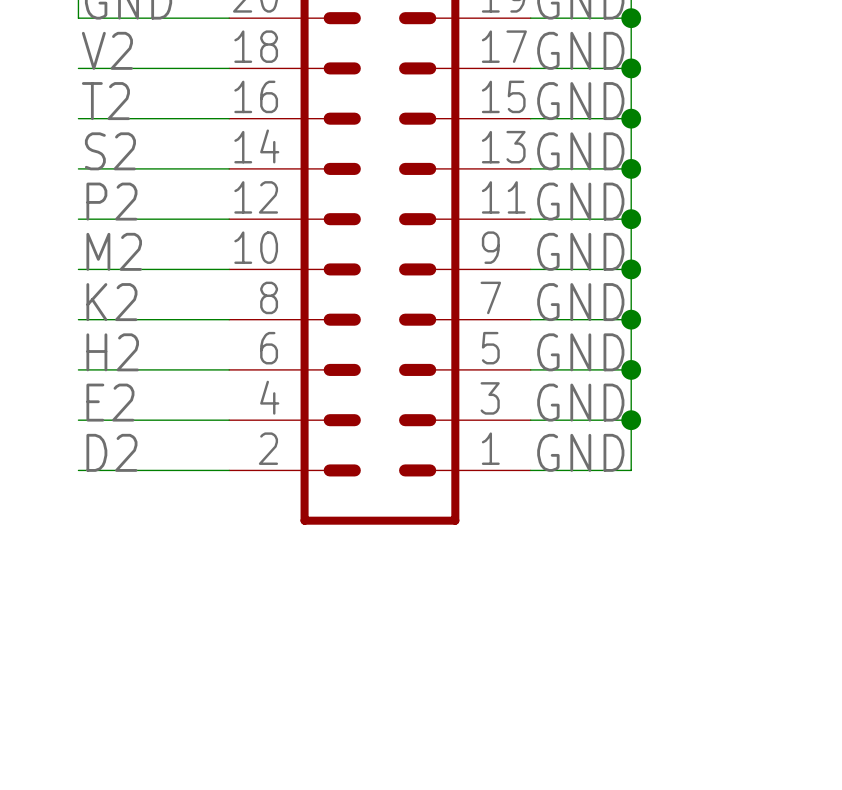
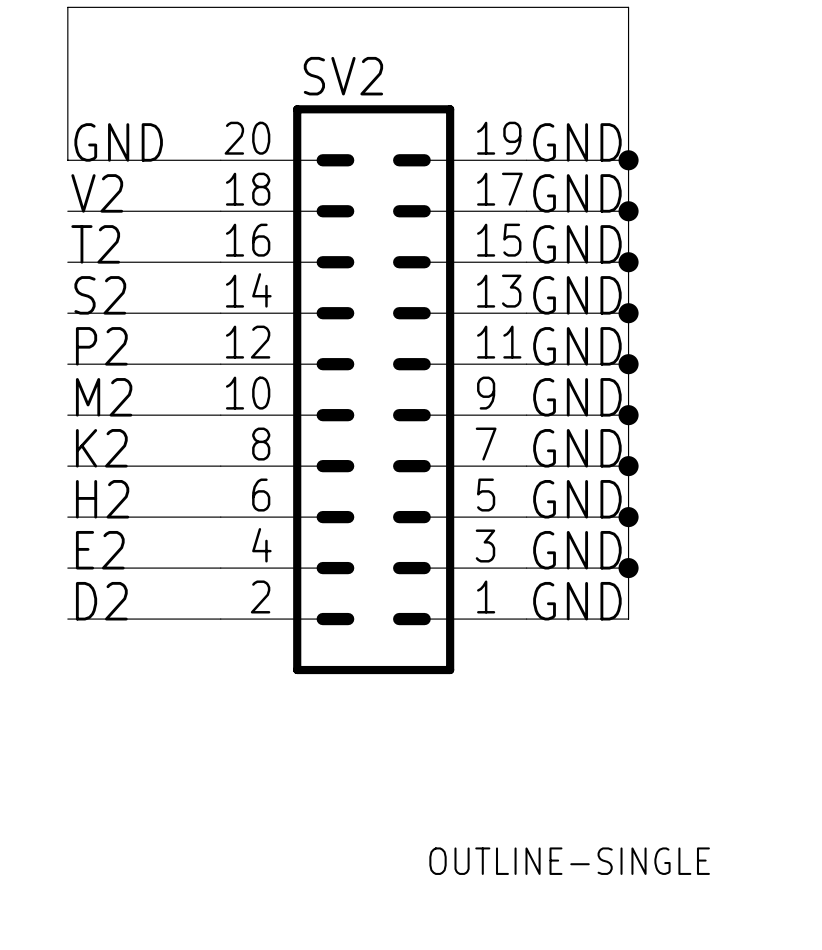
part: none -> OUTLINE-SINGLE (569, 861)

